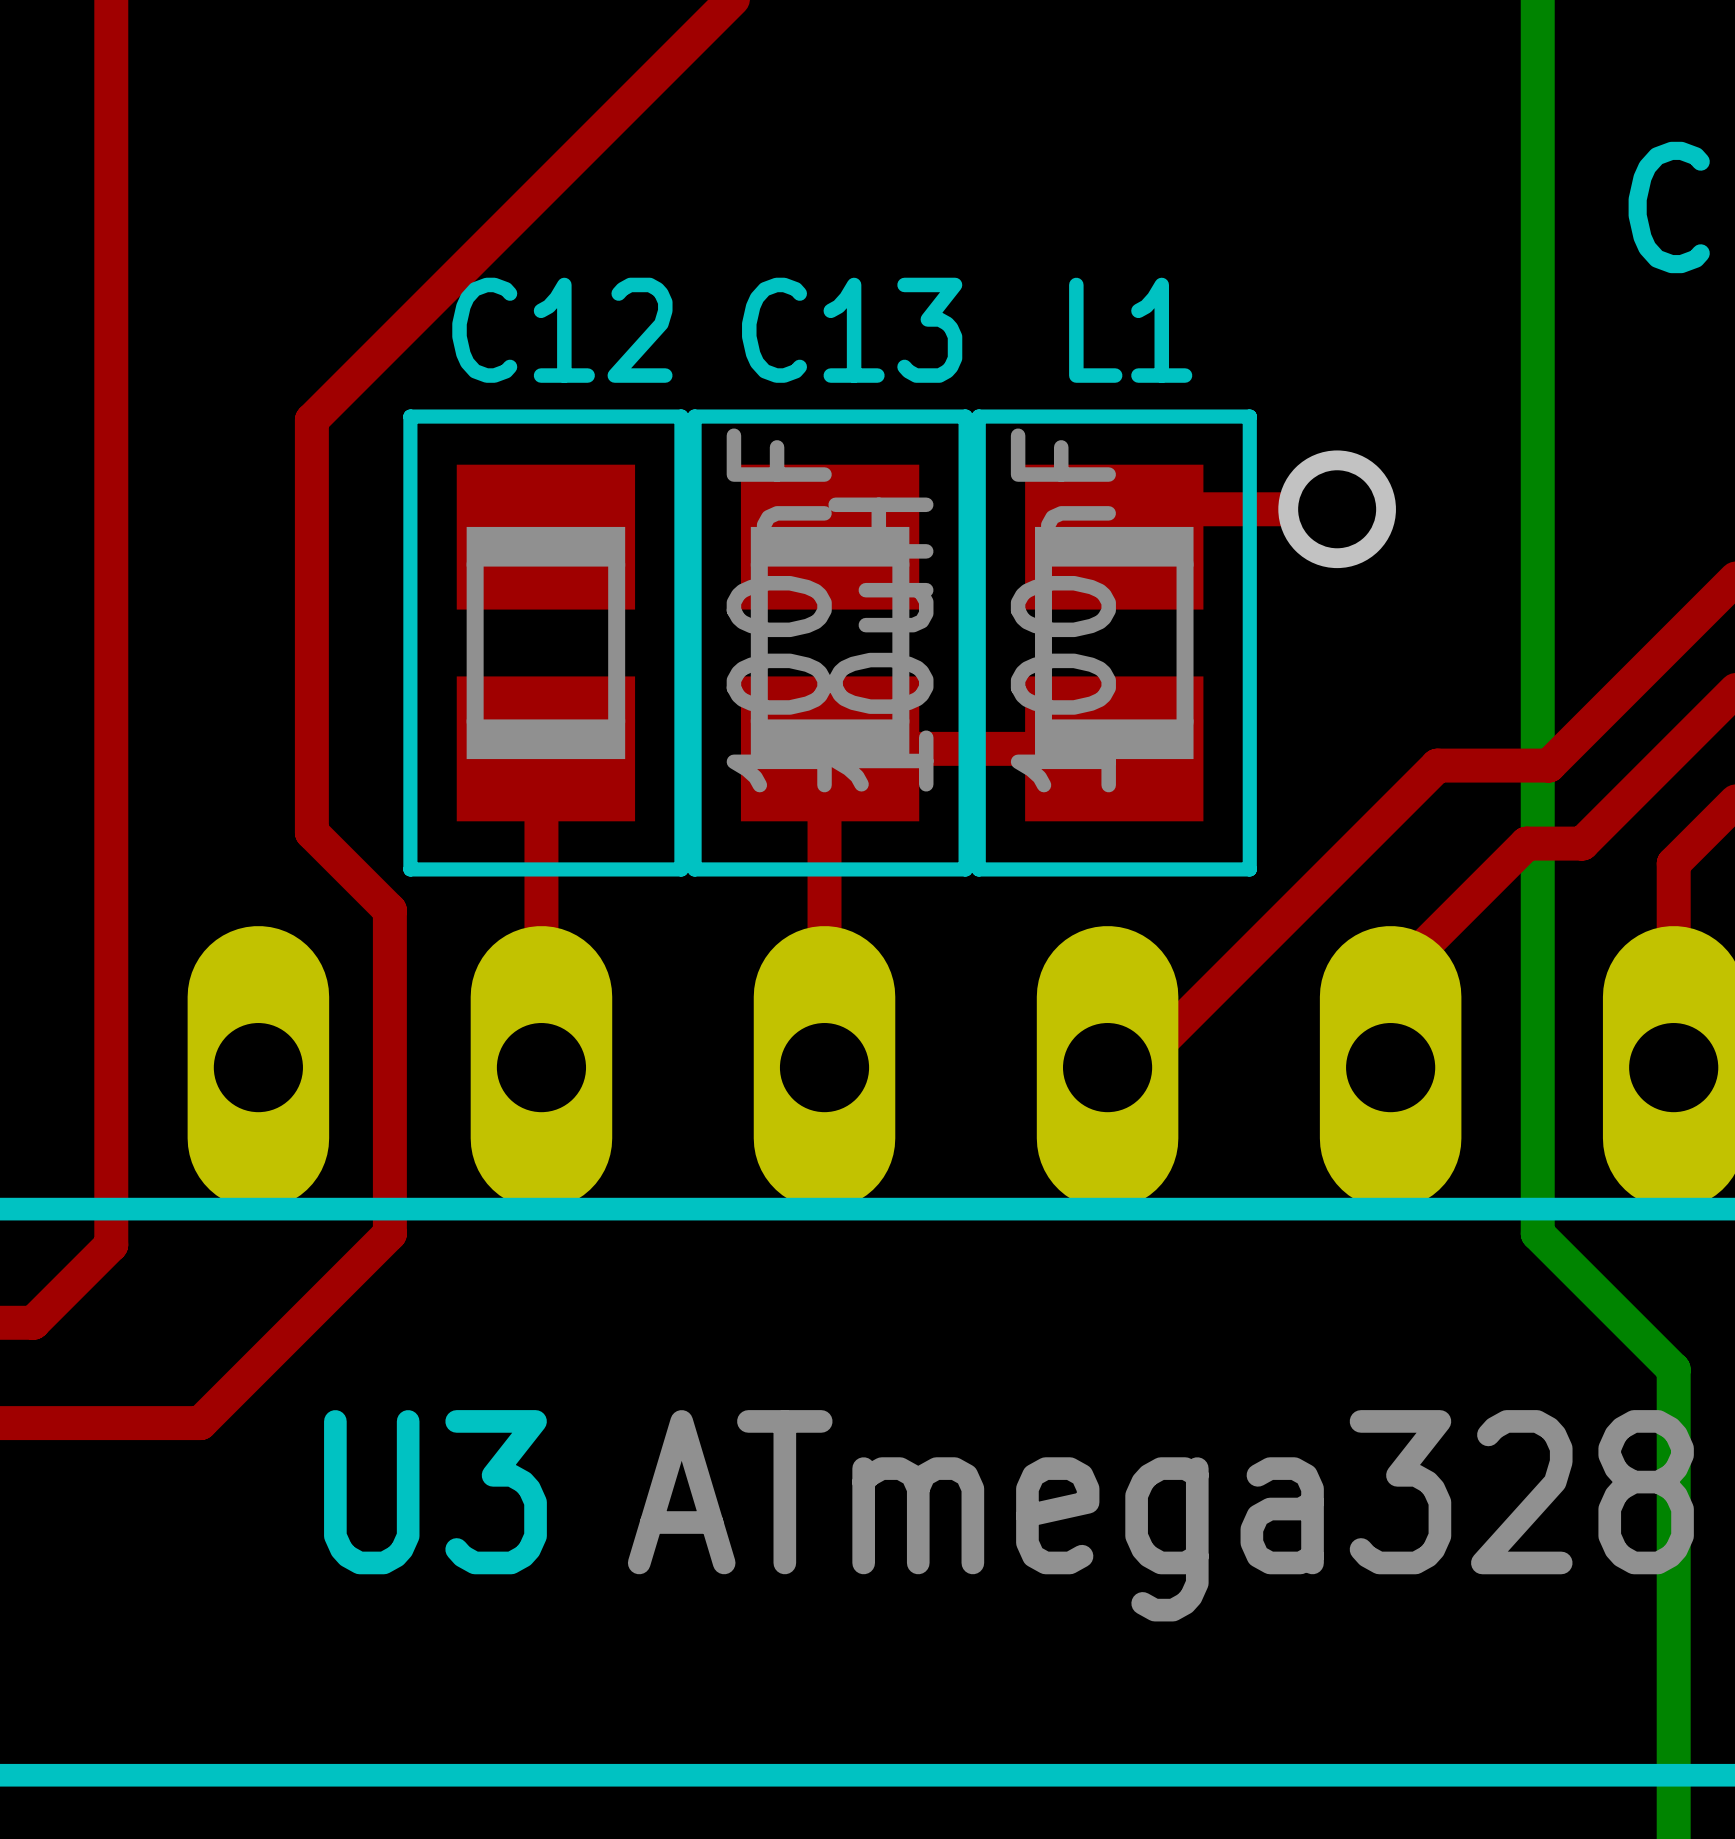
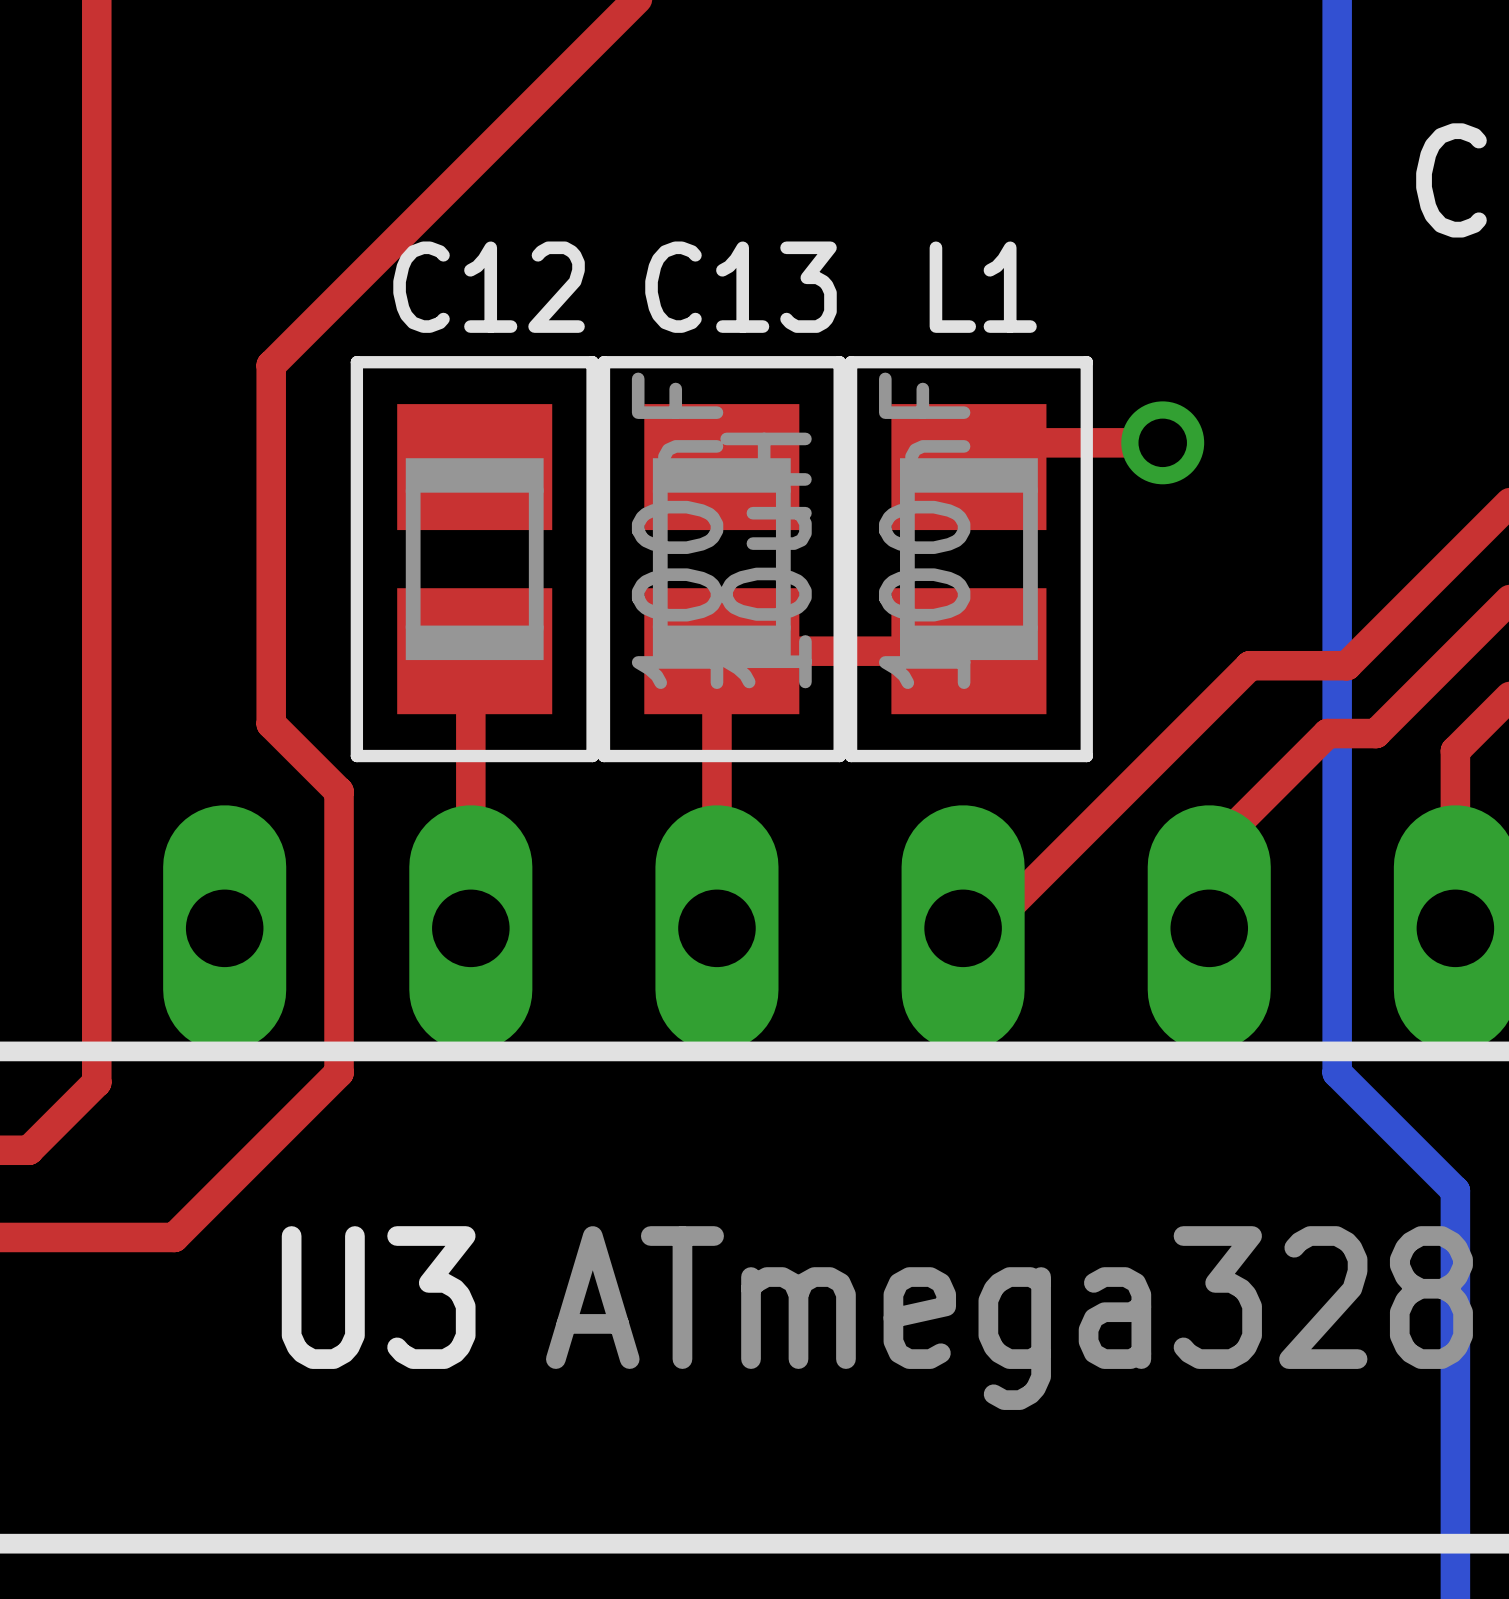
via size: [1278, 450, 1396, 569] -> [1121, 401, 1205, 485]

